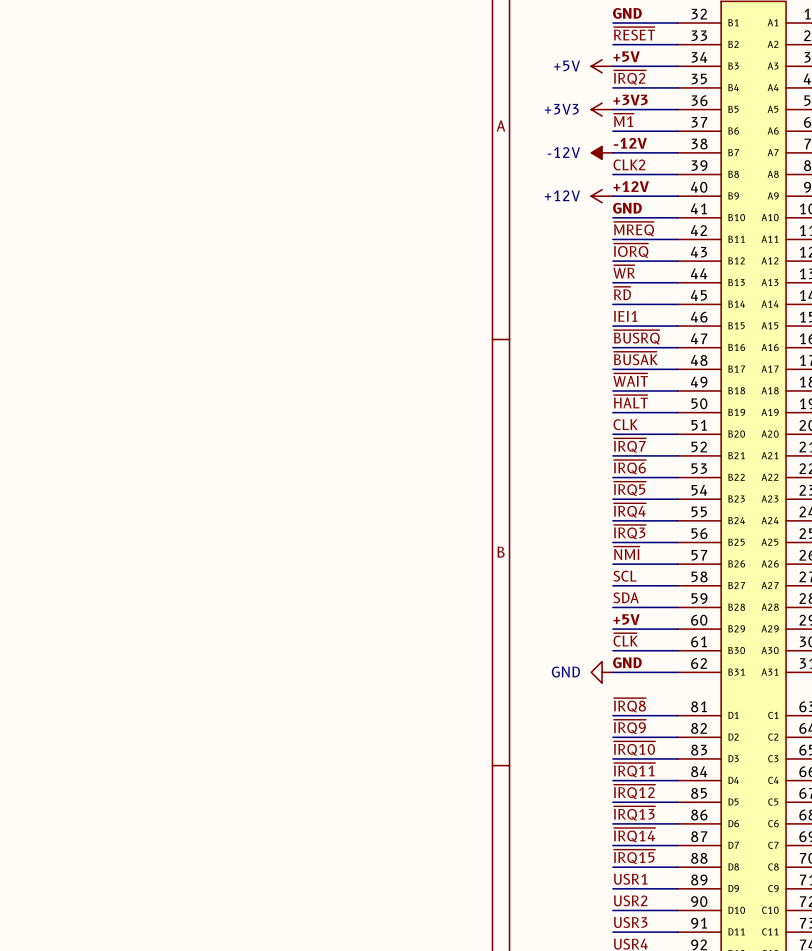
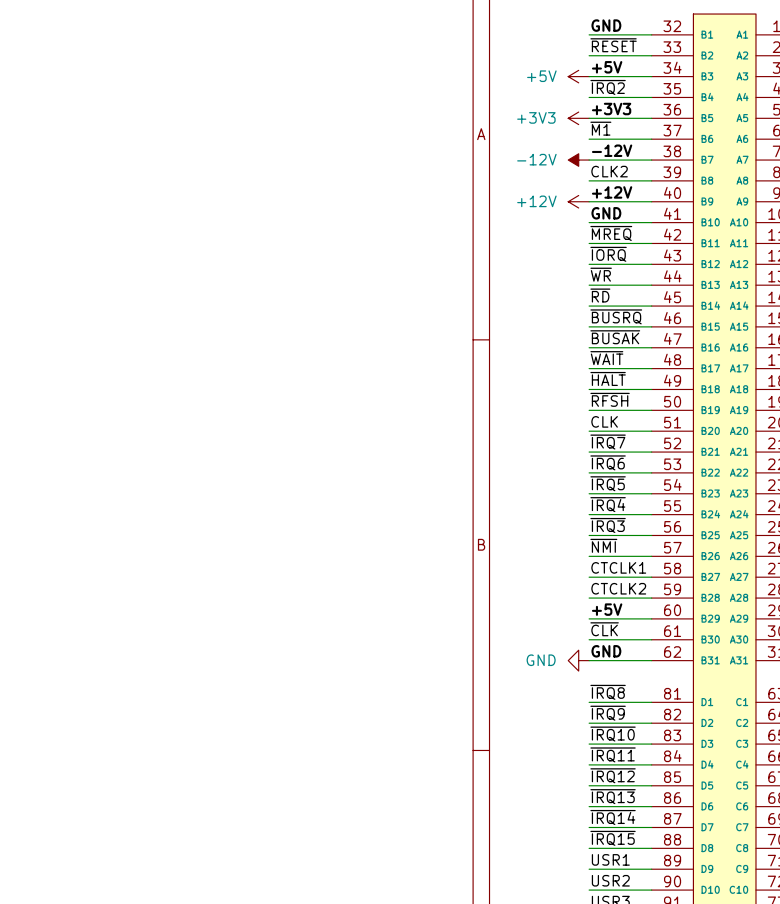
label: IEI1 (625, 316) -> ~{BUSRQ} (616, 316)
label: ~{BUSRQ} (636, 337) -> ~{BUSAK} (615, 337)
label: ~{BUSAK} (635, 358) -> ~{WAIT} (606, 358)
label: ~{WAIT} (630, 380) -> ~{HALT} (608, 378)
label: ~{HALT} (630, 401) -> ~{RFSH} (610, 399)
label: SCL (625, 576) -> CTCLK1 (618, 567)
label: SDA (626, 597) -> CTCLK2 (618, 588)

